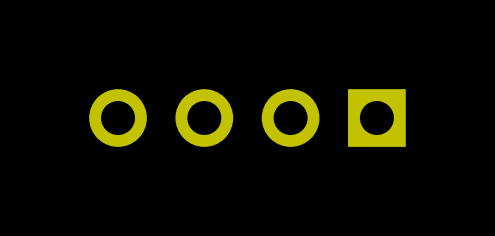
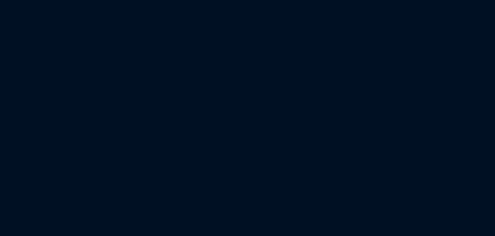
part: (247, 118) -> none

